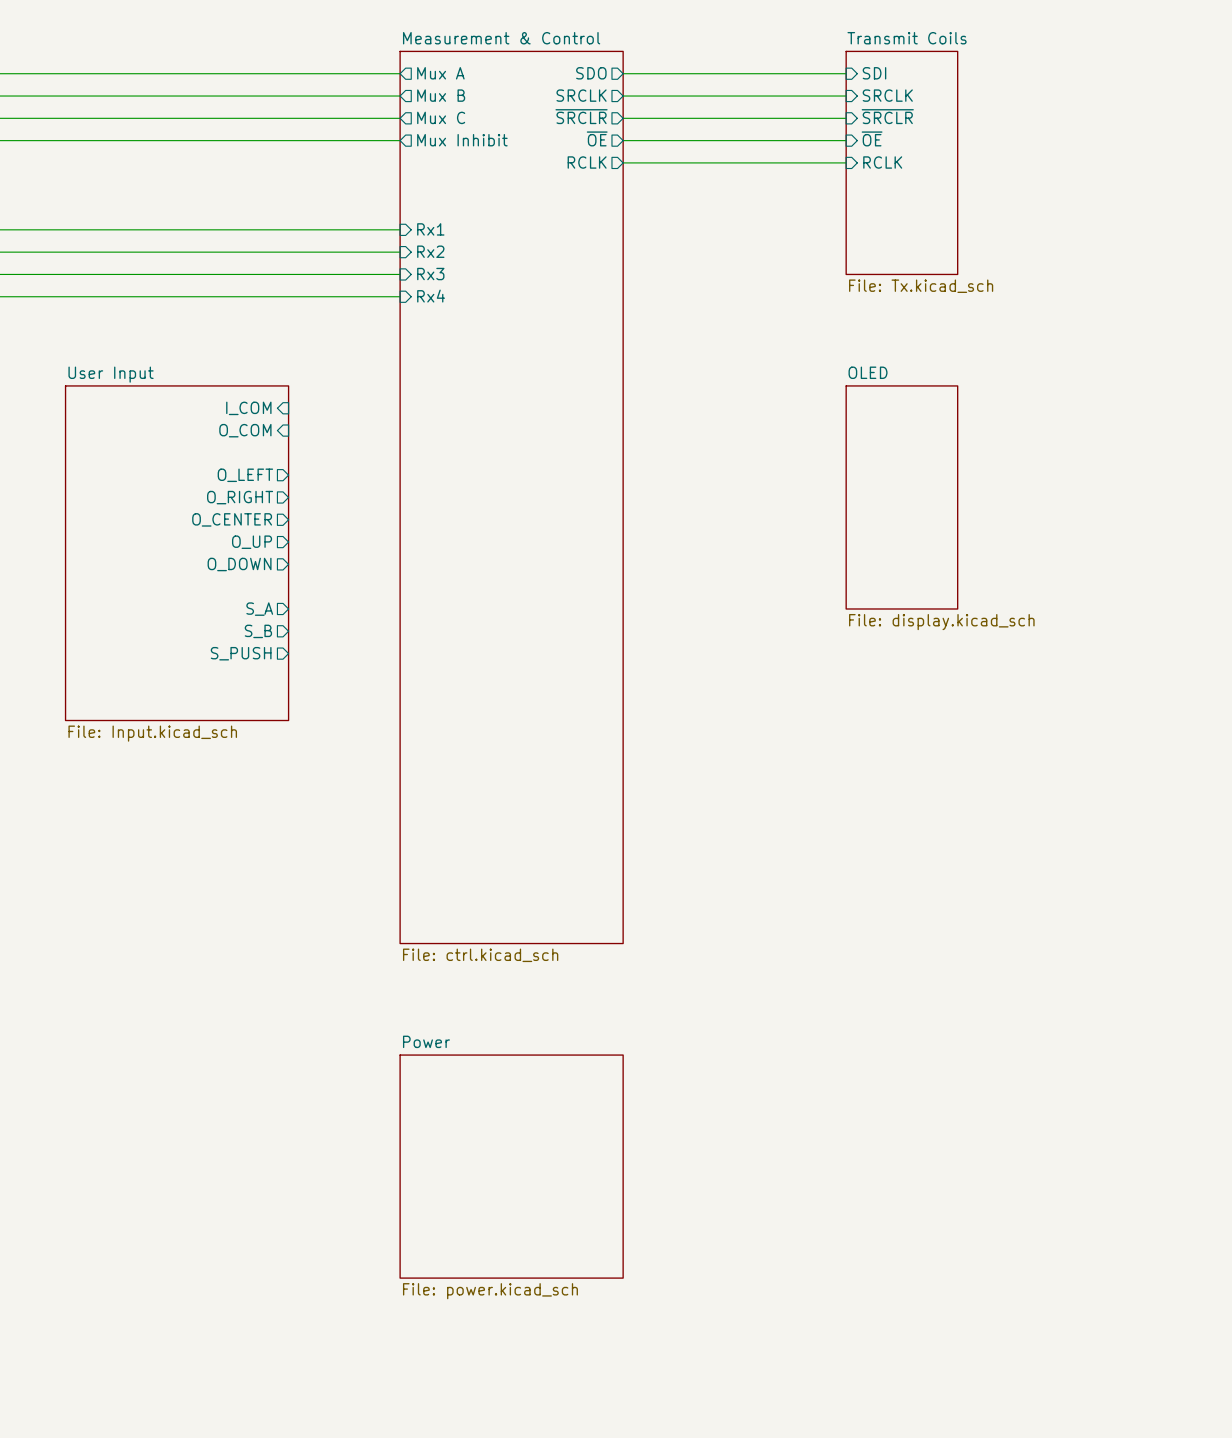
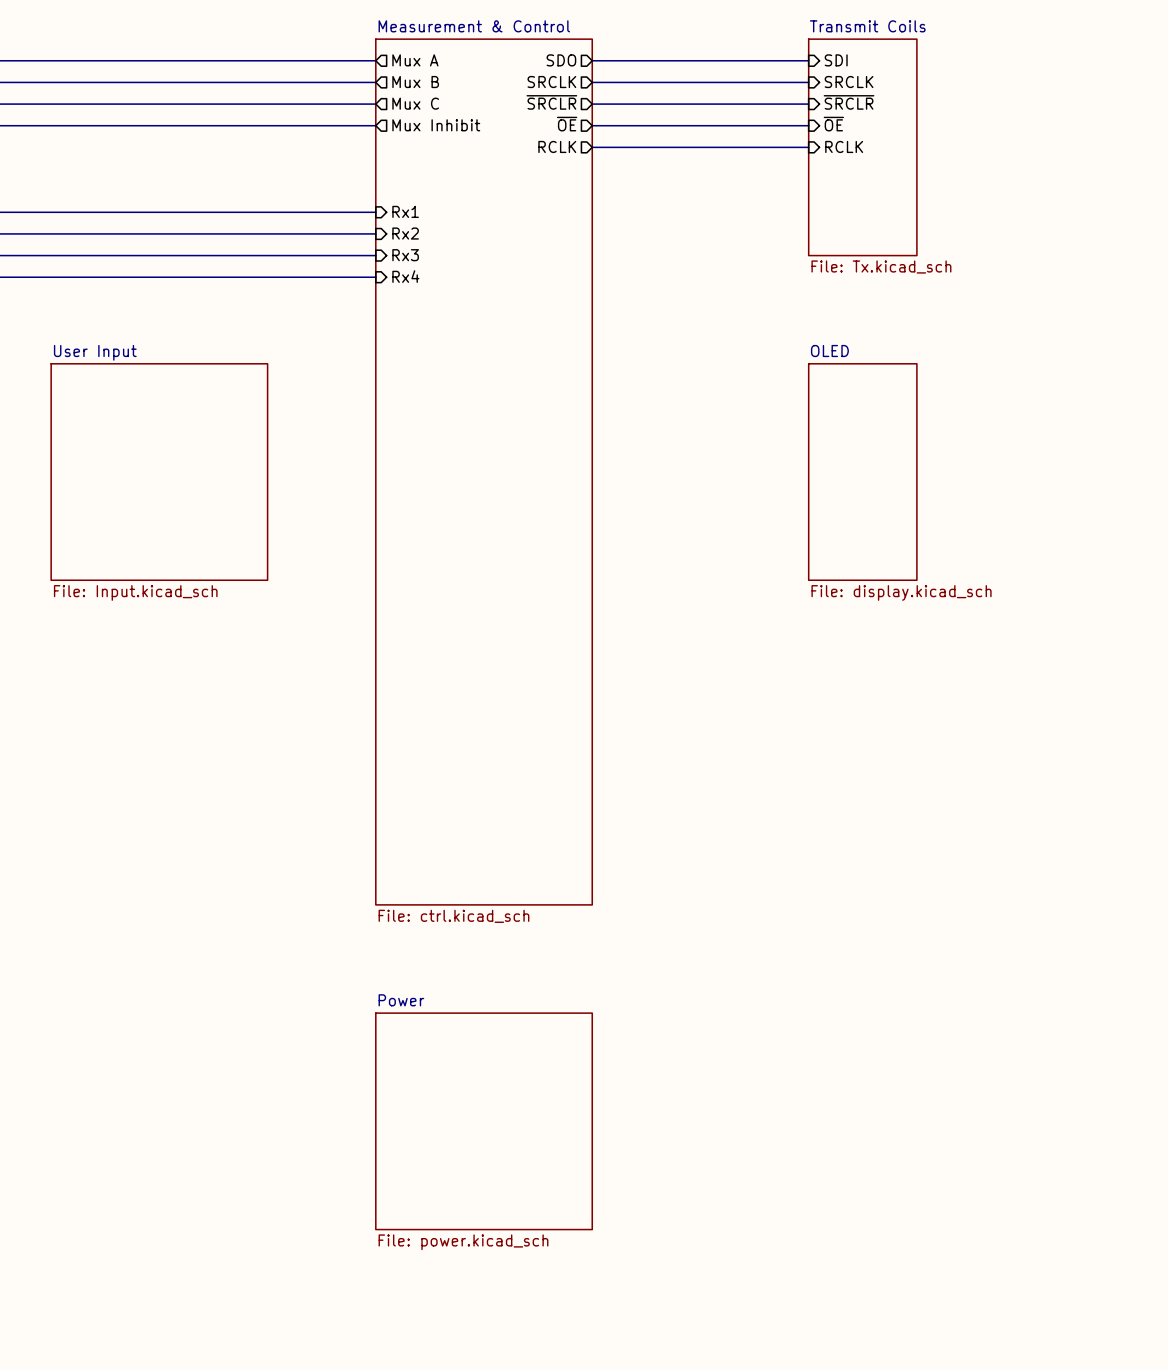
sheet pin: I_COM (248, 408) -> none
sheet pin: O_COM (245, 430) -> none
sheet pin: O_LEFT (245, 475) -> none
sheet User Input: none -> File: Input.kicad_sch (159, 472)
sheet pin: O_RIGHT (240, 497) -> none
sheet pin: O_CENTER (232, 519) -> none
sheet pin: O_UP (252, 542) -> none
sheet User Input: File: Input.kicad_sch (177, 553) -> none
sheet pin: O_DOWN (239, 564) -> none
sheet pin: S_A (259, 609) -> none
sheet pin: S_B (258, 631) -> none
sheet pin: S_PUSH (241, 653) -> none

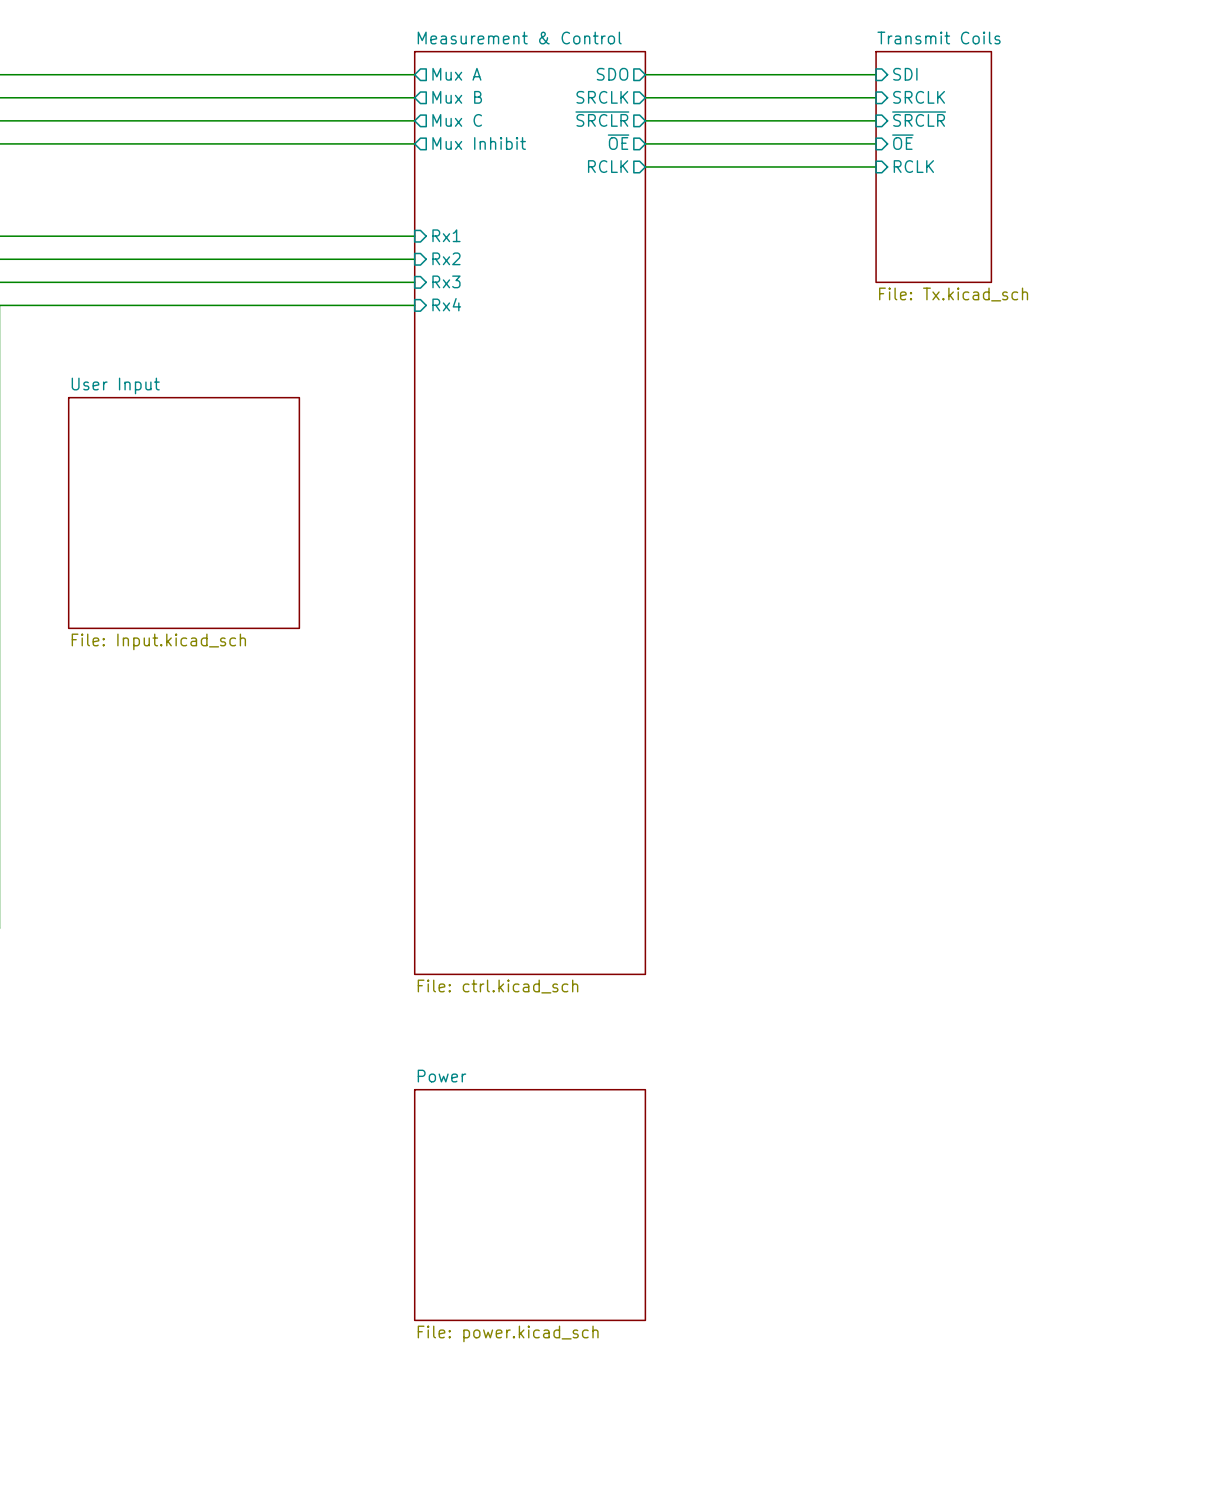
sheet OLED: File: display.kicad_sch (862, 472) -> none

